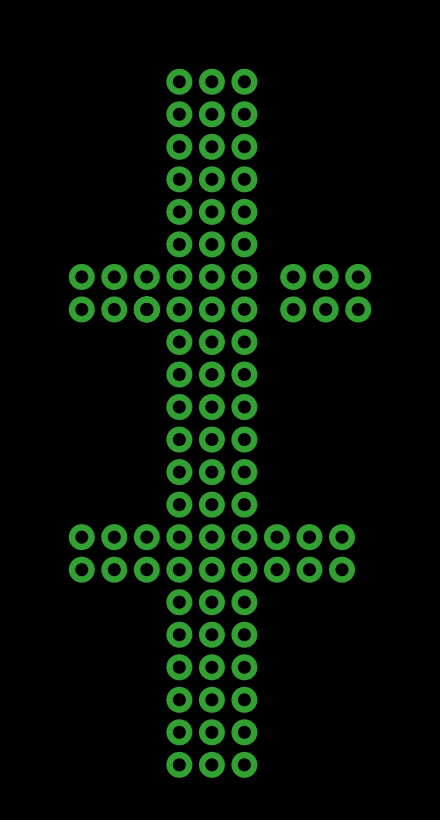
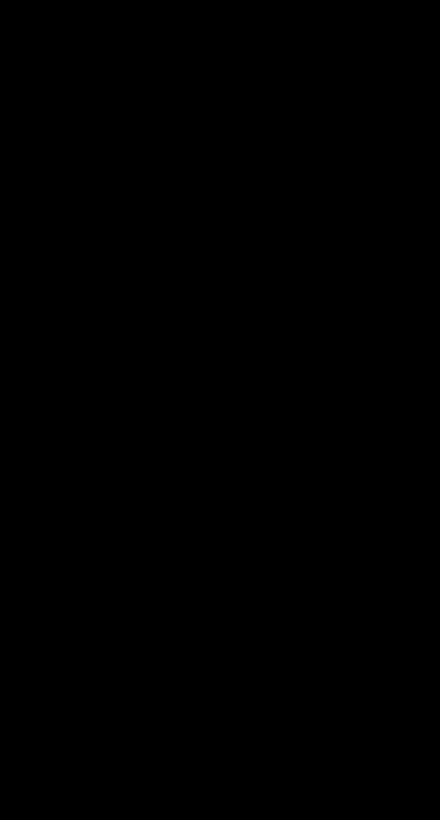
via: (179, 81) -> none
via: (211, 81) -> none
via: (244, 81) -> none
via: (179, 114) -> none
via: (211, 114) -> none
via: (244, 114) -> none
via: (179, 146) -> none
via: (211, 146) -> none
via: (244, 146) -> none
via: (179, 179) -> none
via: (211, 179) -> none
via: (244, 179) -> none
via: (179, 211) -> none
via: (211, 211) -> none
via: (244, 211) -> none
via: (179, 244) -> none
via: (211, 244) -> none
via: (244, 244) -> none
via: (81, 276) -> none
via: (114, 276) -> none
via: (146, 276) -> none
via: (179, 276) -> none
via: (211, 276) -> none
via: (244, 276) -> none
via: (293, 276) -> none
via: (325, 276) -> none
via: (358, 276) -> none
via: (81, 309) -> none
via: (114, 309) -> none
via: (146, 309) -> none
via: (179, 309) -> none
via: (211, 309) -> none
via: (244, 309) -> none
via: (293, 309) -> none
via: (325, 309) -> none
via: (358, 309) -> none
via: (179, 341) -> none
via: (211, 341) -> none
via: (244, 341) -> none
via: (179, 374) -> none
via: (211, 374) -> none
via: (244, 374) -> none
via: (179, 407) -> none
via: (211, 407) -> none
via: (244, 407) -> none
via: (179, 439) -> none
via: (211, 439) -> none
via: (244, 439) -> none
via: (179, 472) -> none
via: (211, 472) -> none
via: (244, 472) -> none
via: (179, 504) -> none
via: (211, 504) -> none
via: (244, 504) -> none
via: (81, 537) -> none
via: (114, 537) -> none
via: (146, 537) -> none
via: (179, 537) -> none
via: (211, 537) -> none
via: (244, 537) -> none
via: (276, 537) -> none
via: (309, 537) -> none
via: (341, 537) -> none
via: (81, 569) -> none
via: (114, 569) -> none
via: (146, 569) -> none
via: (179, 569) -> none
via: (211, 569) -> none
via: (244, 569) -> none
via: (276, 569) -> none
via: (309, 569) -> none
via: (341, 569) -> none
via: (179, 602) -> none
via: (211, 602) -> none
via: (244, 602) -> none
via: (179, 634) -> none
via: (211, 634) -> none
via: (244, 634) -> none
via: (179, 667) -> none
via: (211, 667) -> none
via: (244, 667) -> none
via: (179, 699) -> none
via: (211, 699) -> none
via: (244, 699) -> none
via: (179, 732) -> none
via: (211, 732) -> none
via: (244, 732) -> none
via: (179, 764) -> none
via: (211, 764) -> none
via: (244, 764) -> none

